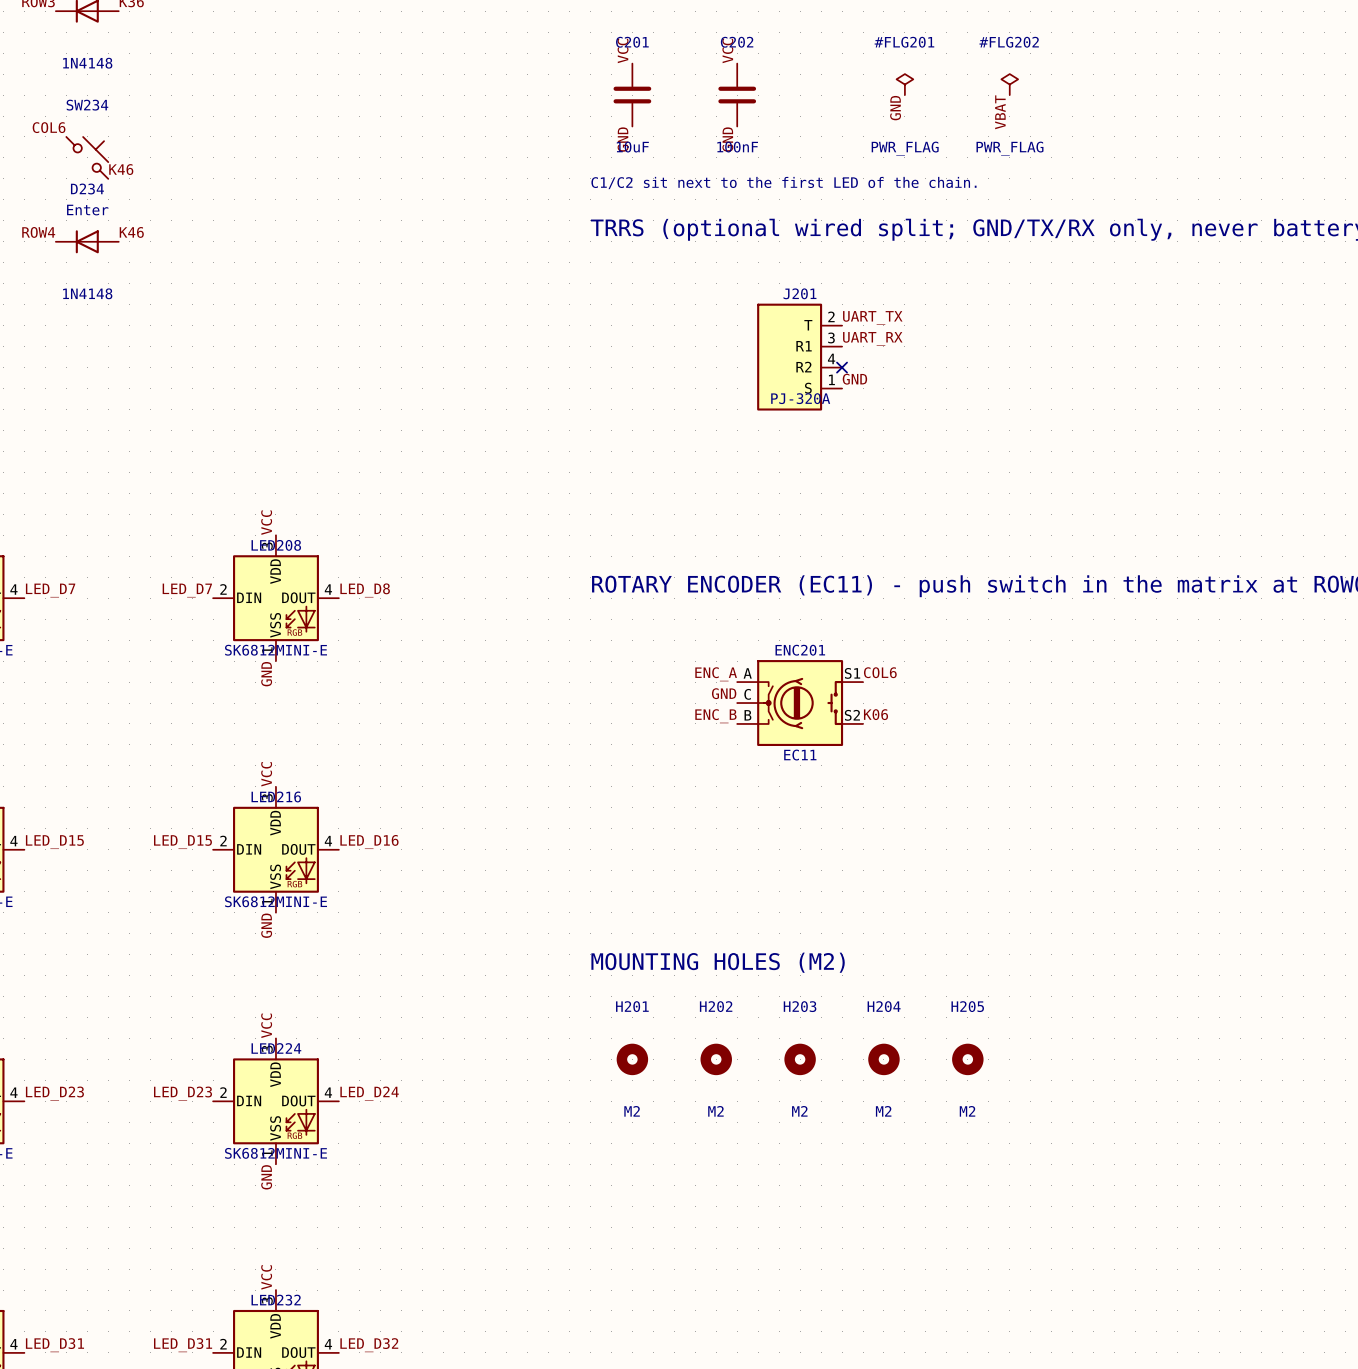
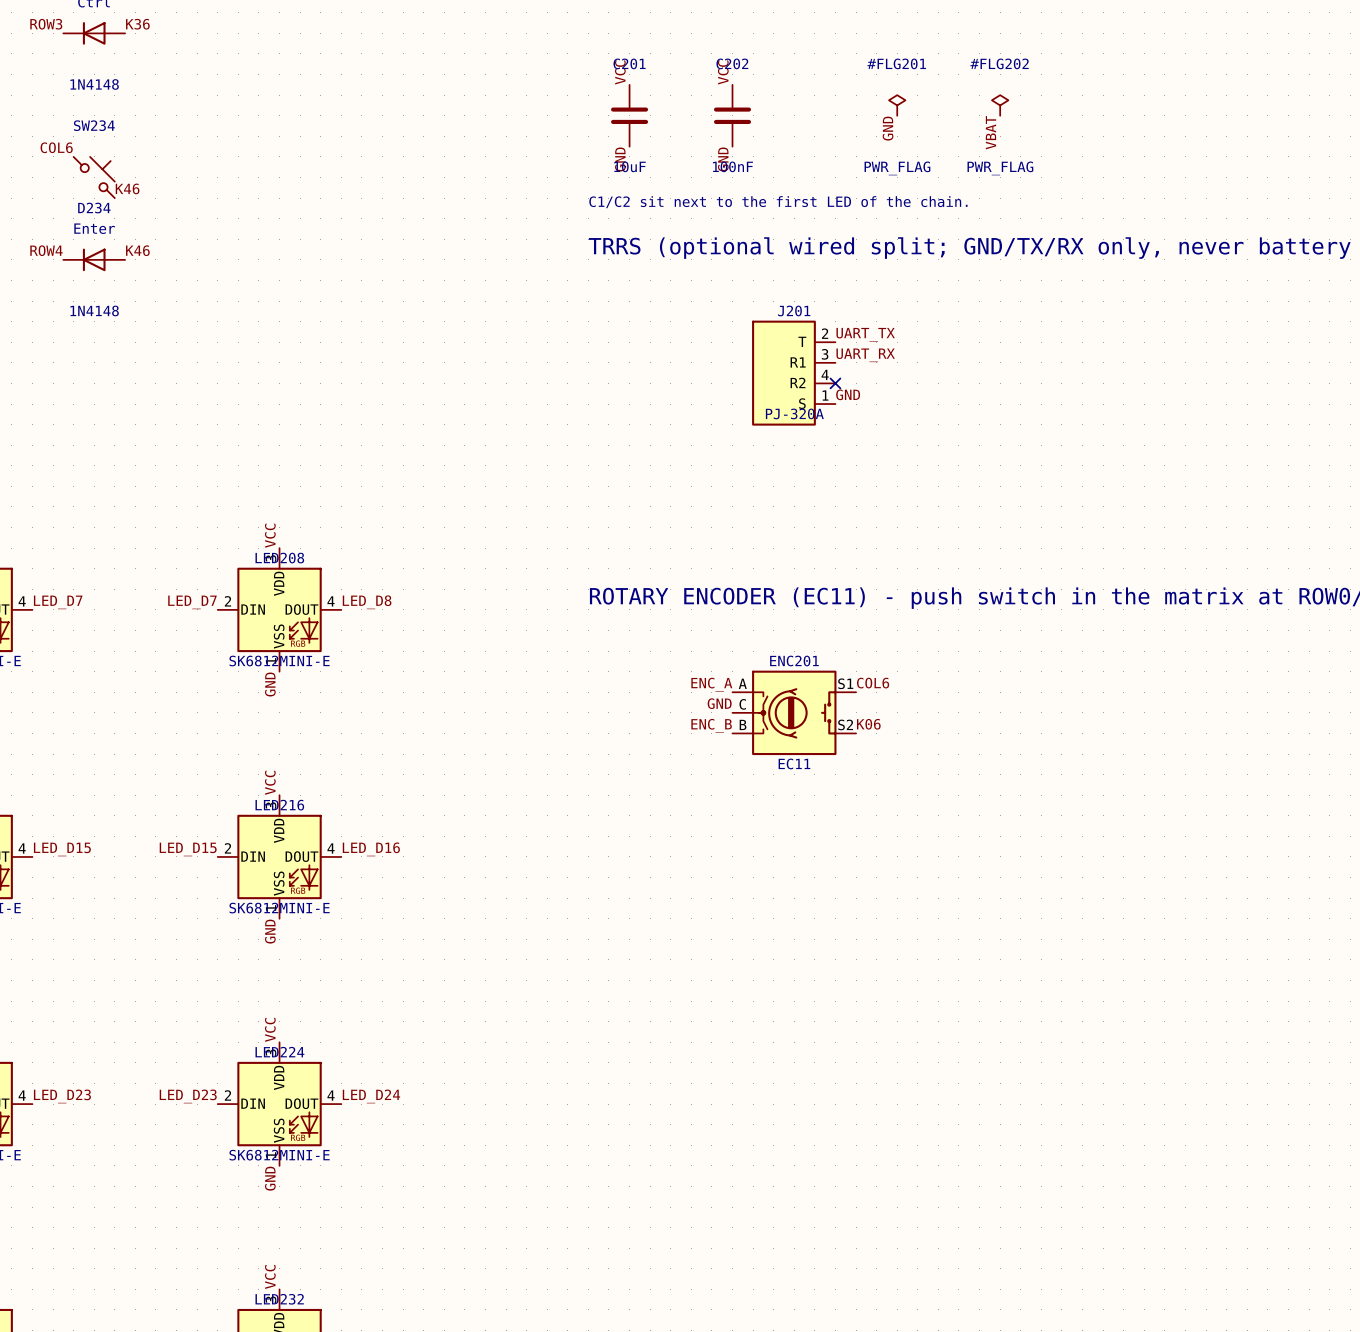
text: MOUNTING HOLES (M2) (718, 962) -> none
H201: M2 (632, 1059) -> none
H202: M2 (716, 1059) -> none
H203: M2 (800, 1059) -> none
H204: M2 (883, 1059) -> none
H205: M2 (967, 1059) -> none

